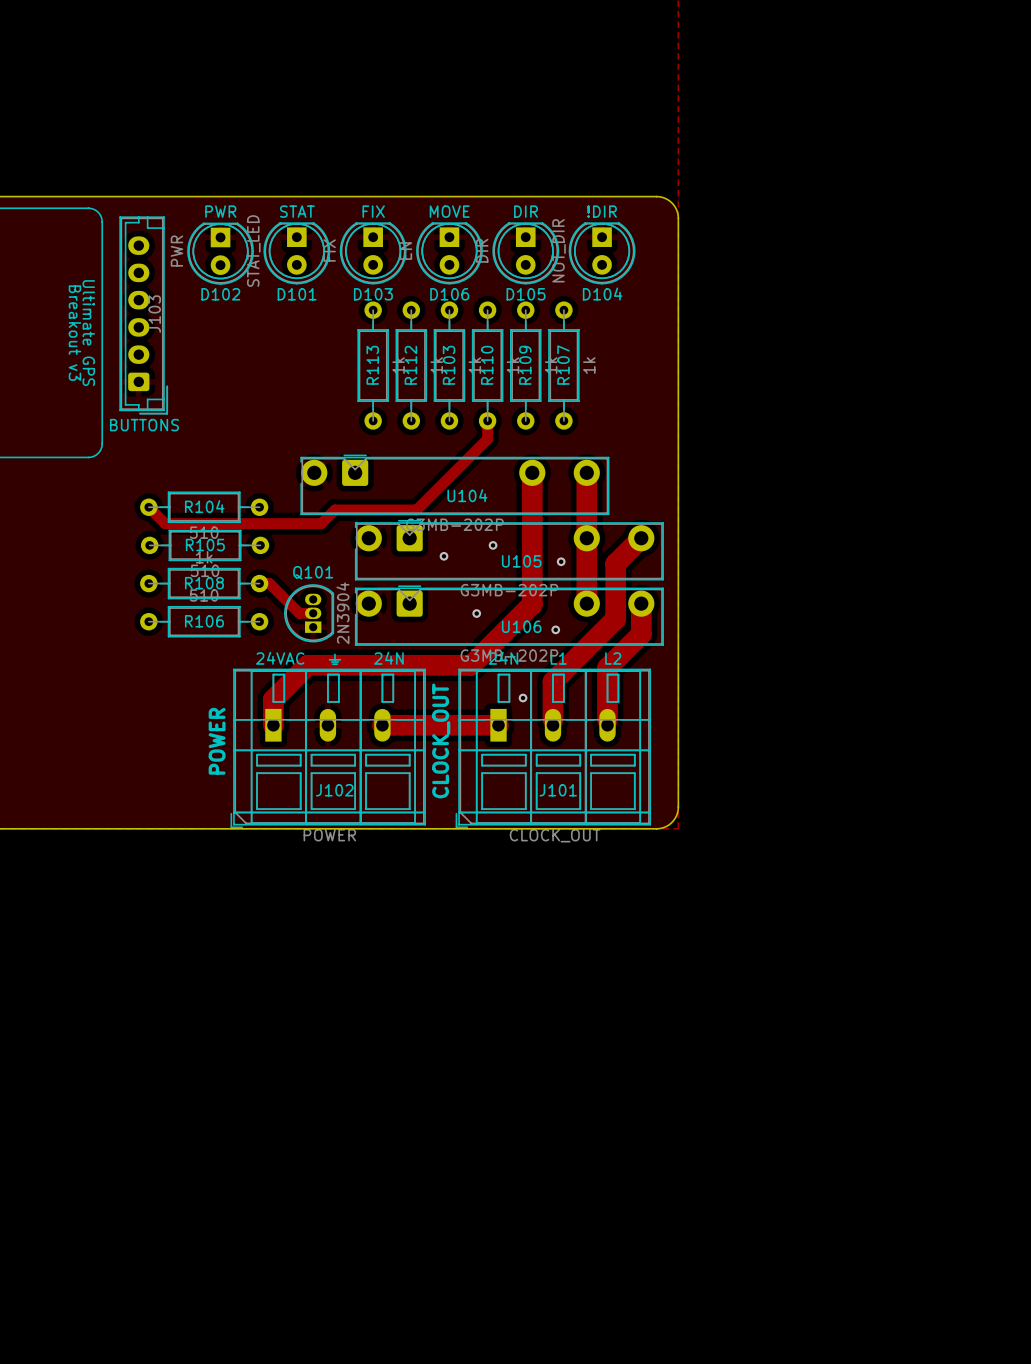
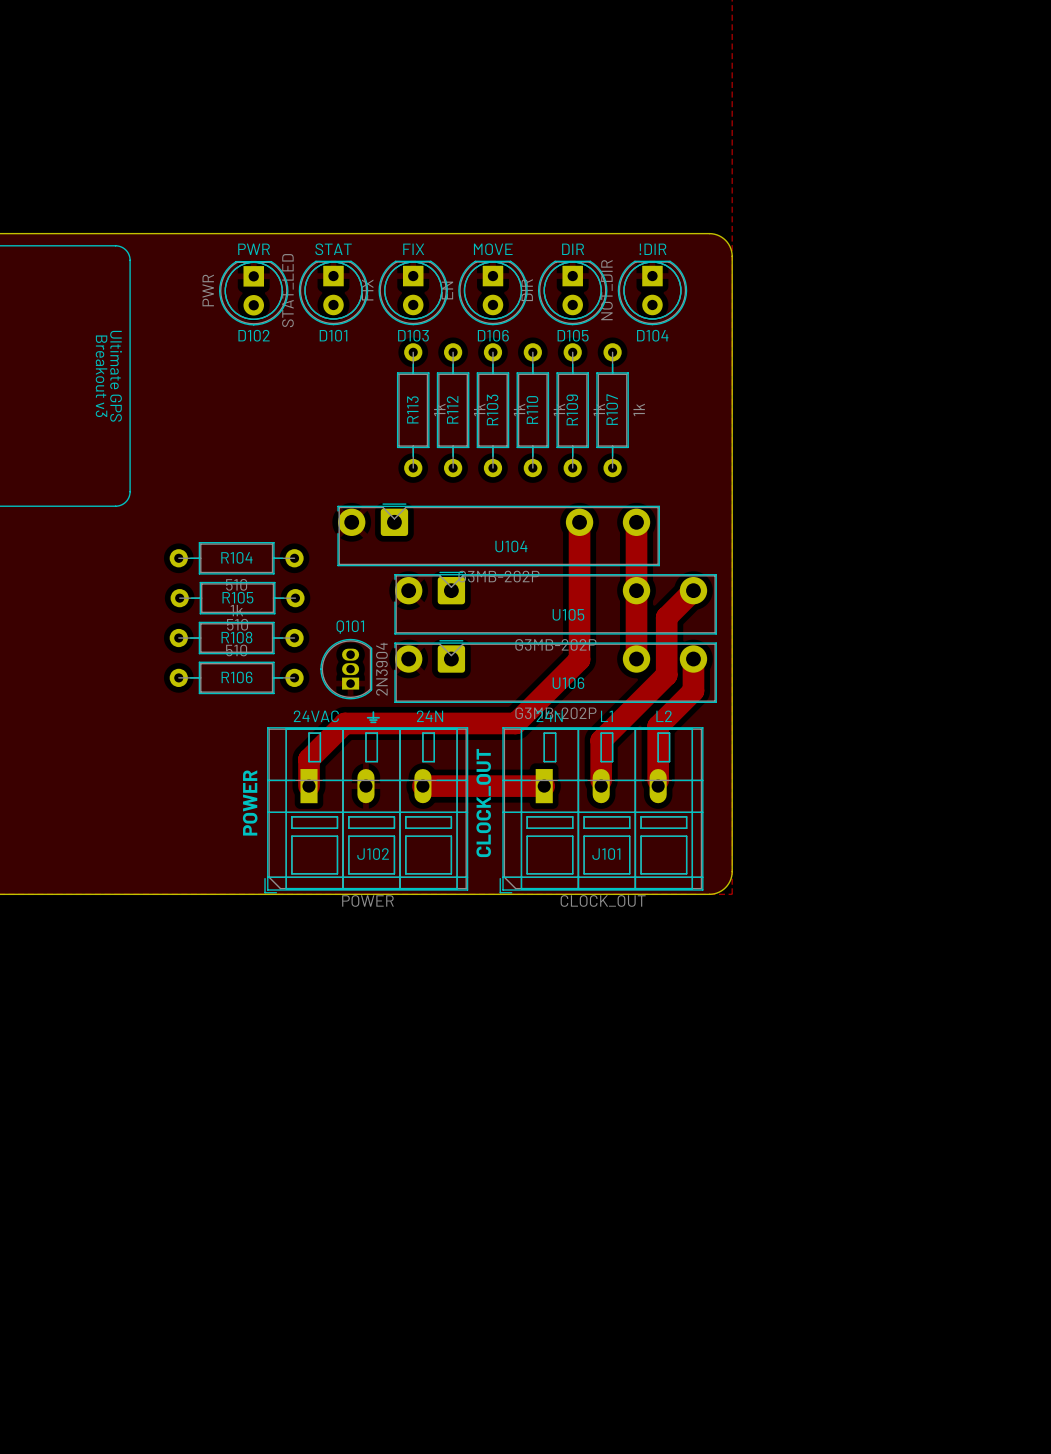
J103: BUTTONS (143, 315) -> none
track: (487, 420) (487, 439) (416, 509) (335, 509) (321, 523) (165, 523) (148, 507) -> none
via: (493, 545) -> none
via: (444, 556) -> none
via: (561, 561) -> none
track: (259, 583) (269, 583) (299, 613) (313, 613) -> none
via: (476, 613) -> none
via: (555, 629) -> none
via: (523, 698) -> none

